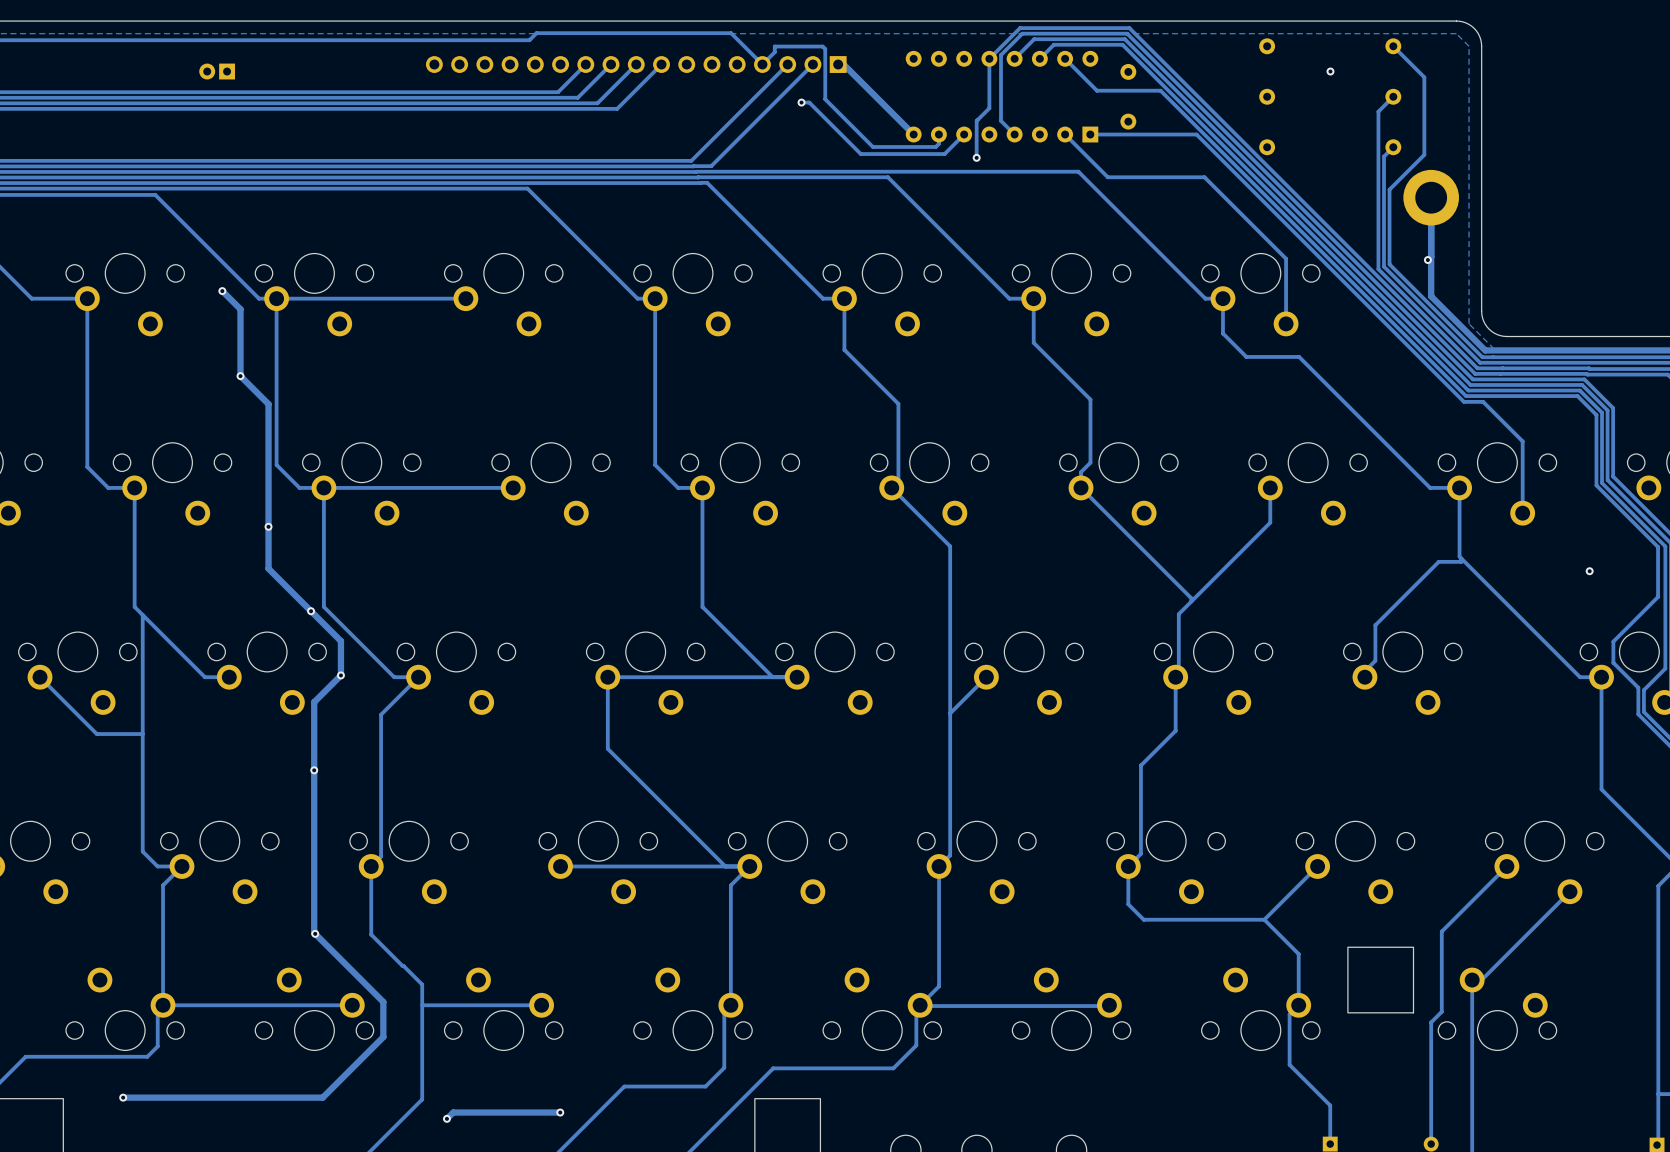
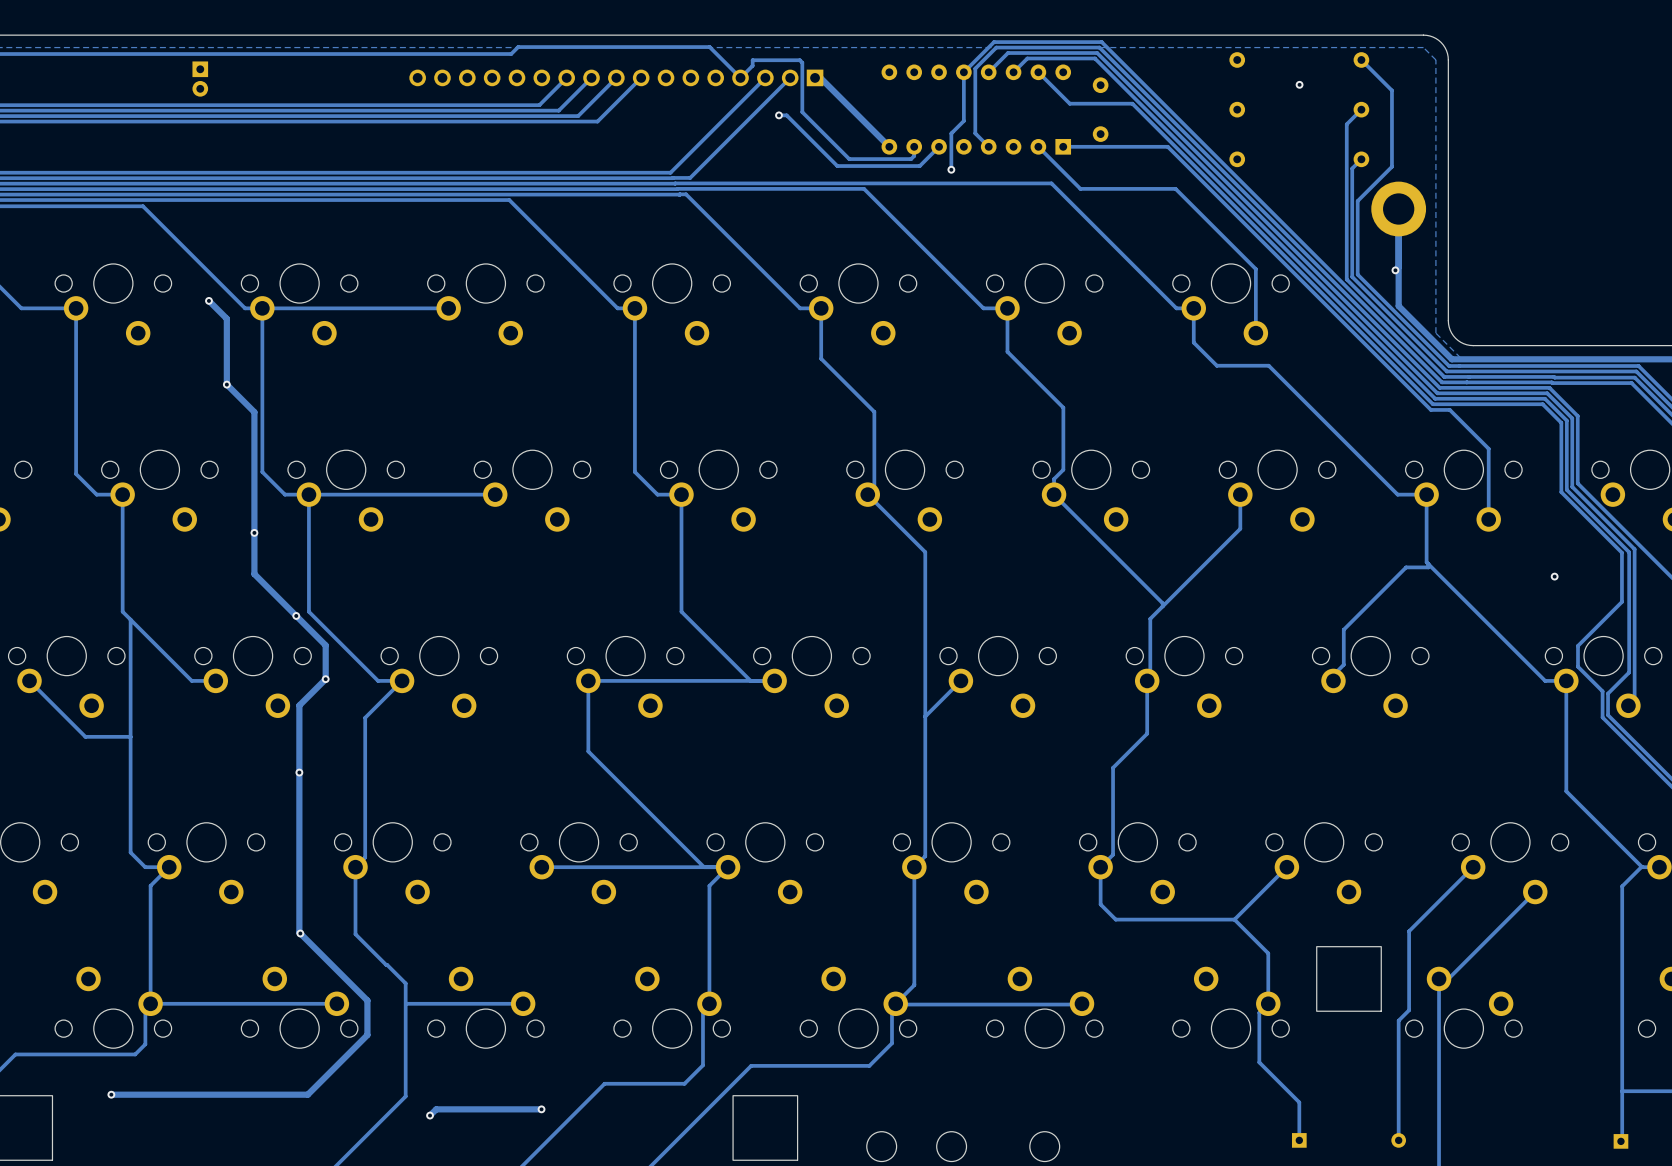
part rotation: 0° (217, 71) -> 90° counterclockwise (200, 79)

